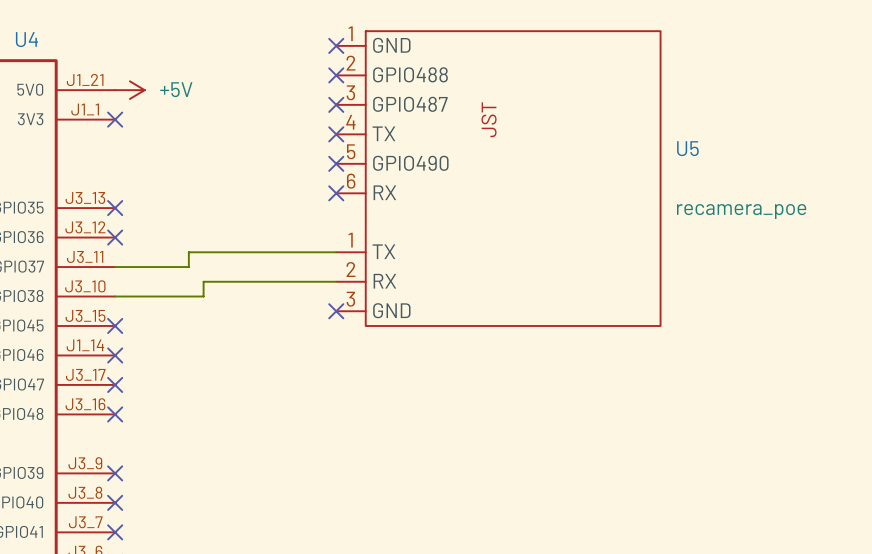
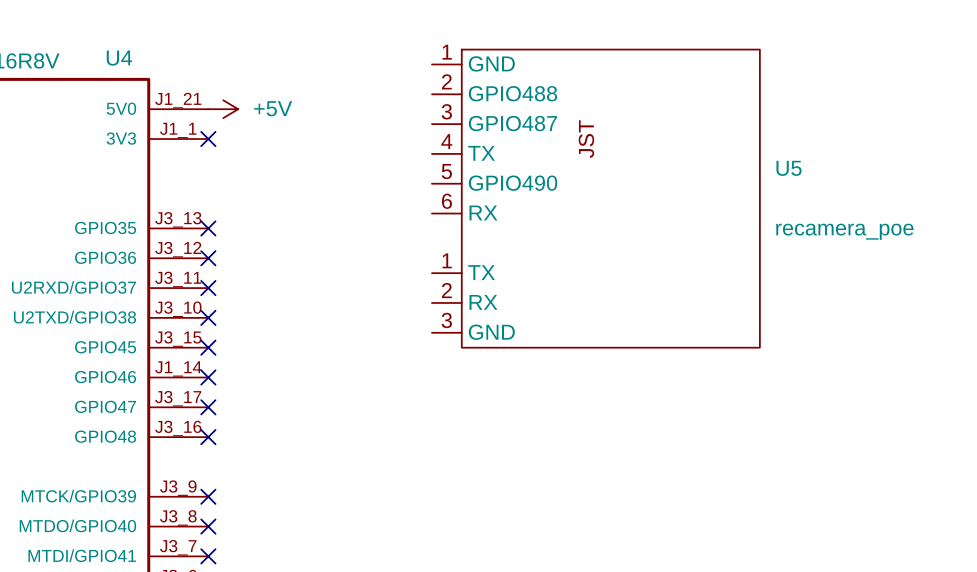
no-connect mark: (336, 45) -> none
no-connect mark: (336, 75) -> none
no-connect mark: (336, 104) -> none
no-connect mark: (336, 134) -> none
no-connect mark: (336, 163) -> none
no-connect mark: (336, 193) -> none
wire: (336, 252) (188, 252) (188, 267) (115, 267) -> none
no-connect mark: none -> (208, 288)
wire: (336, 281) (203, 281) (203, 296) (115, 296) -> none
no-connect mark: none -> (208, 317)
no-connect mark: (336, 311) -> none

